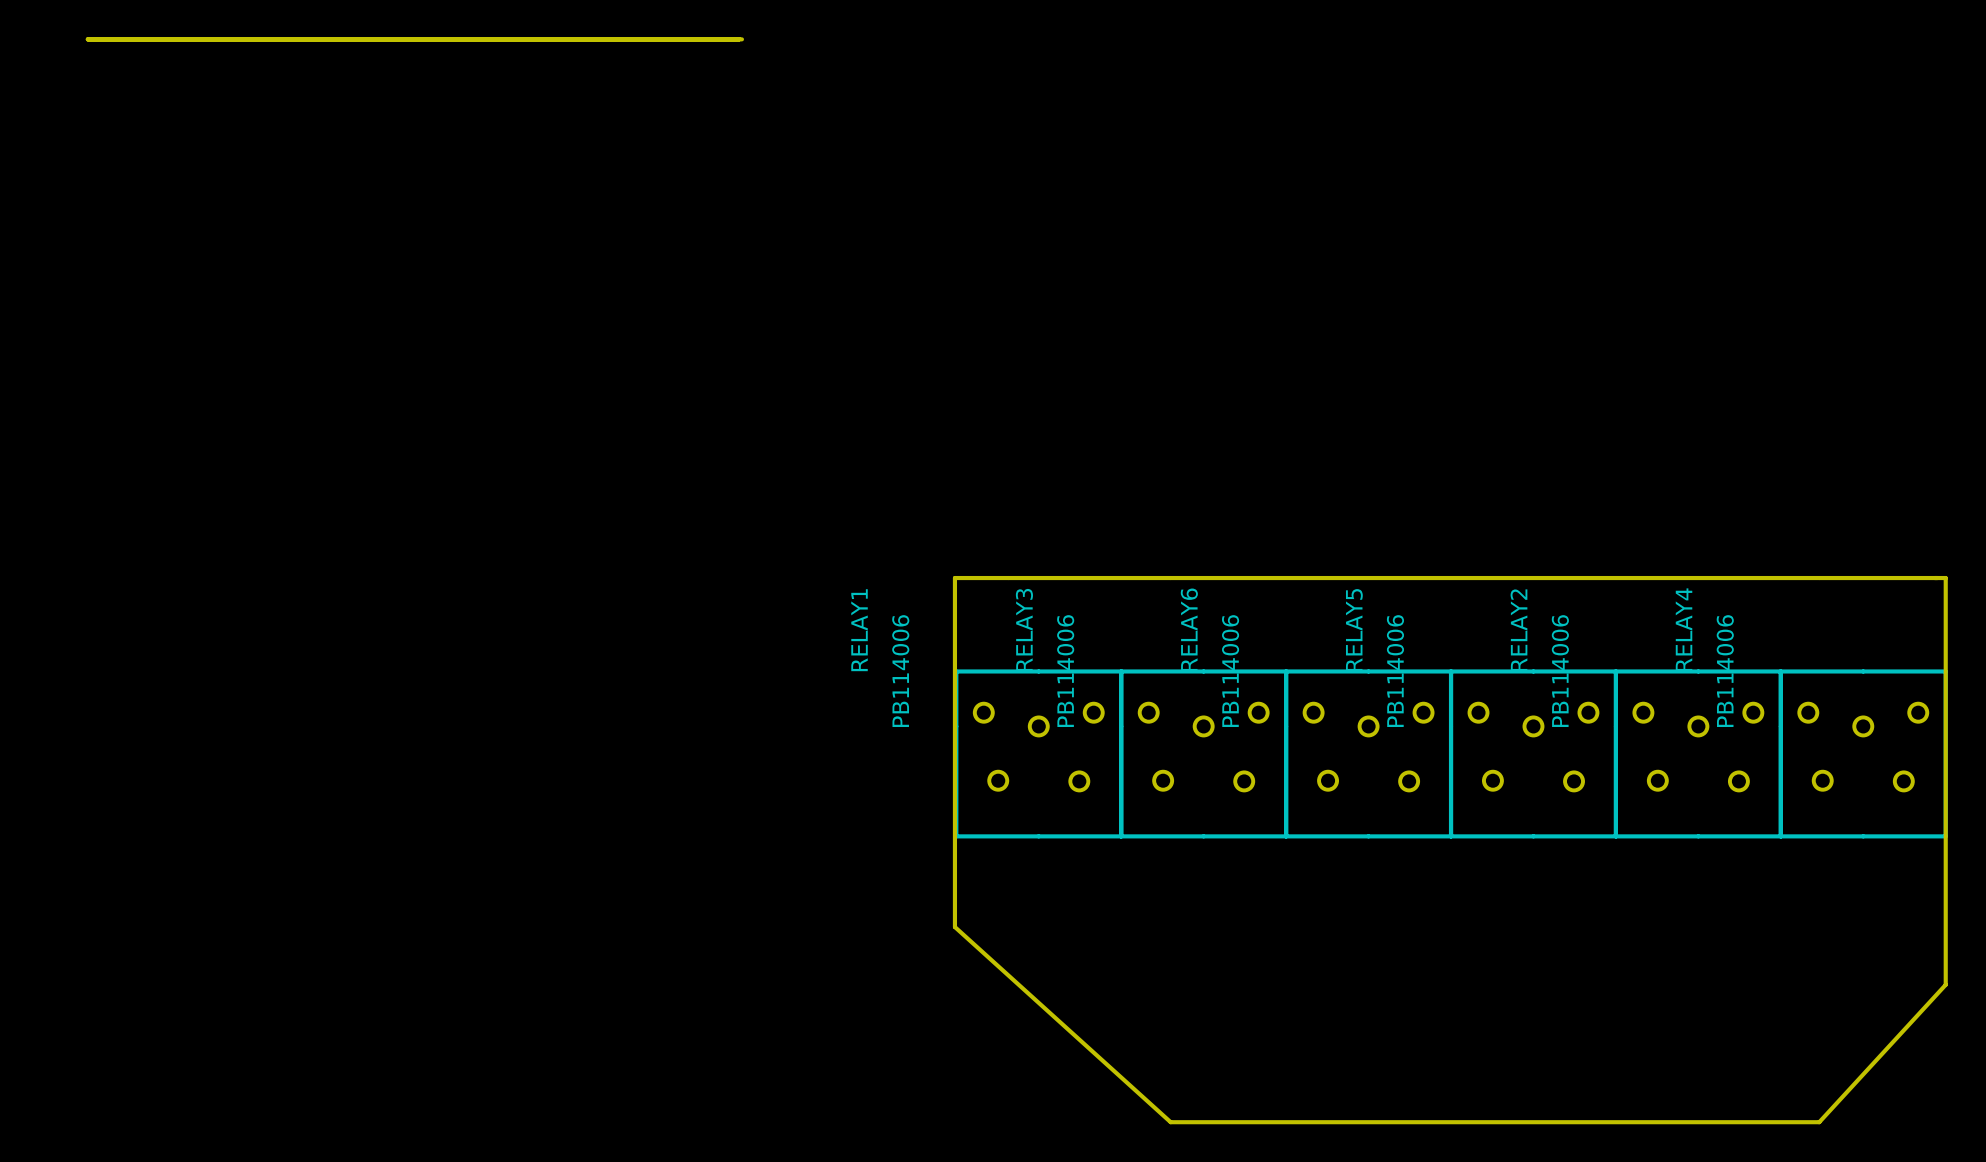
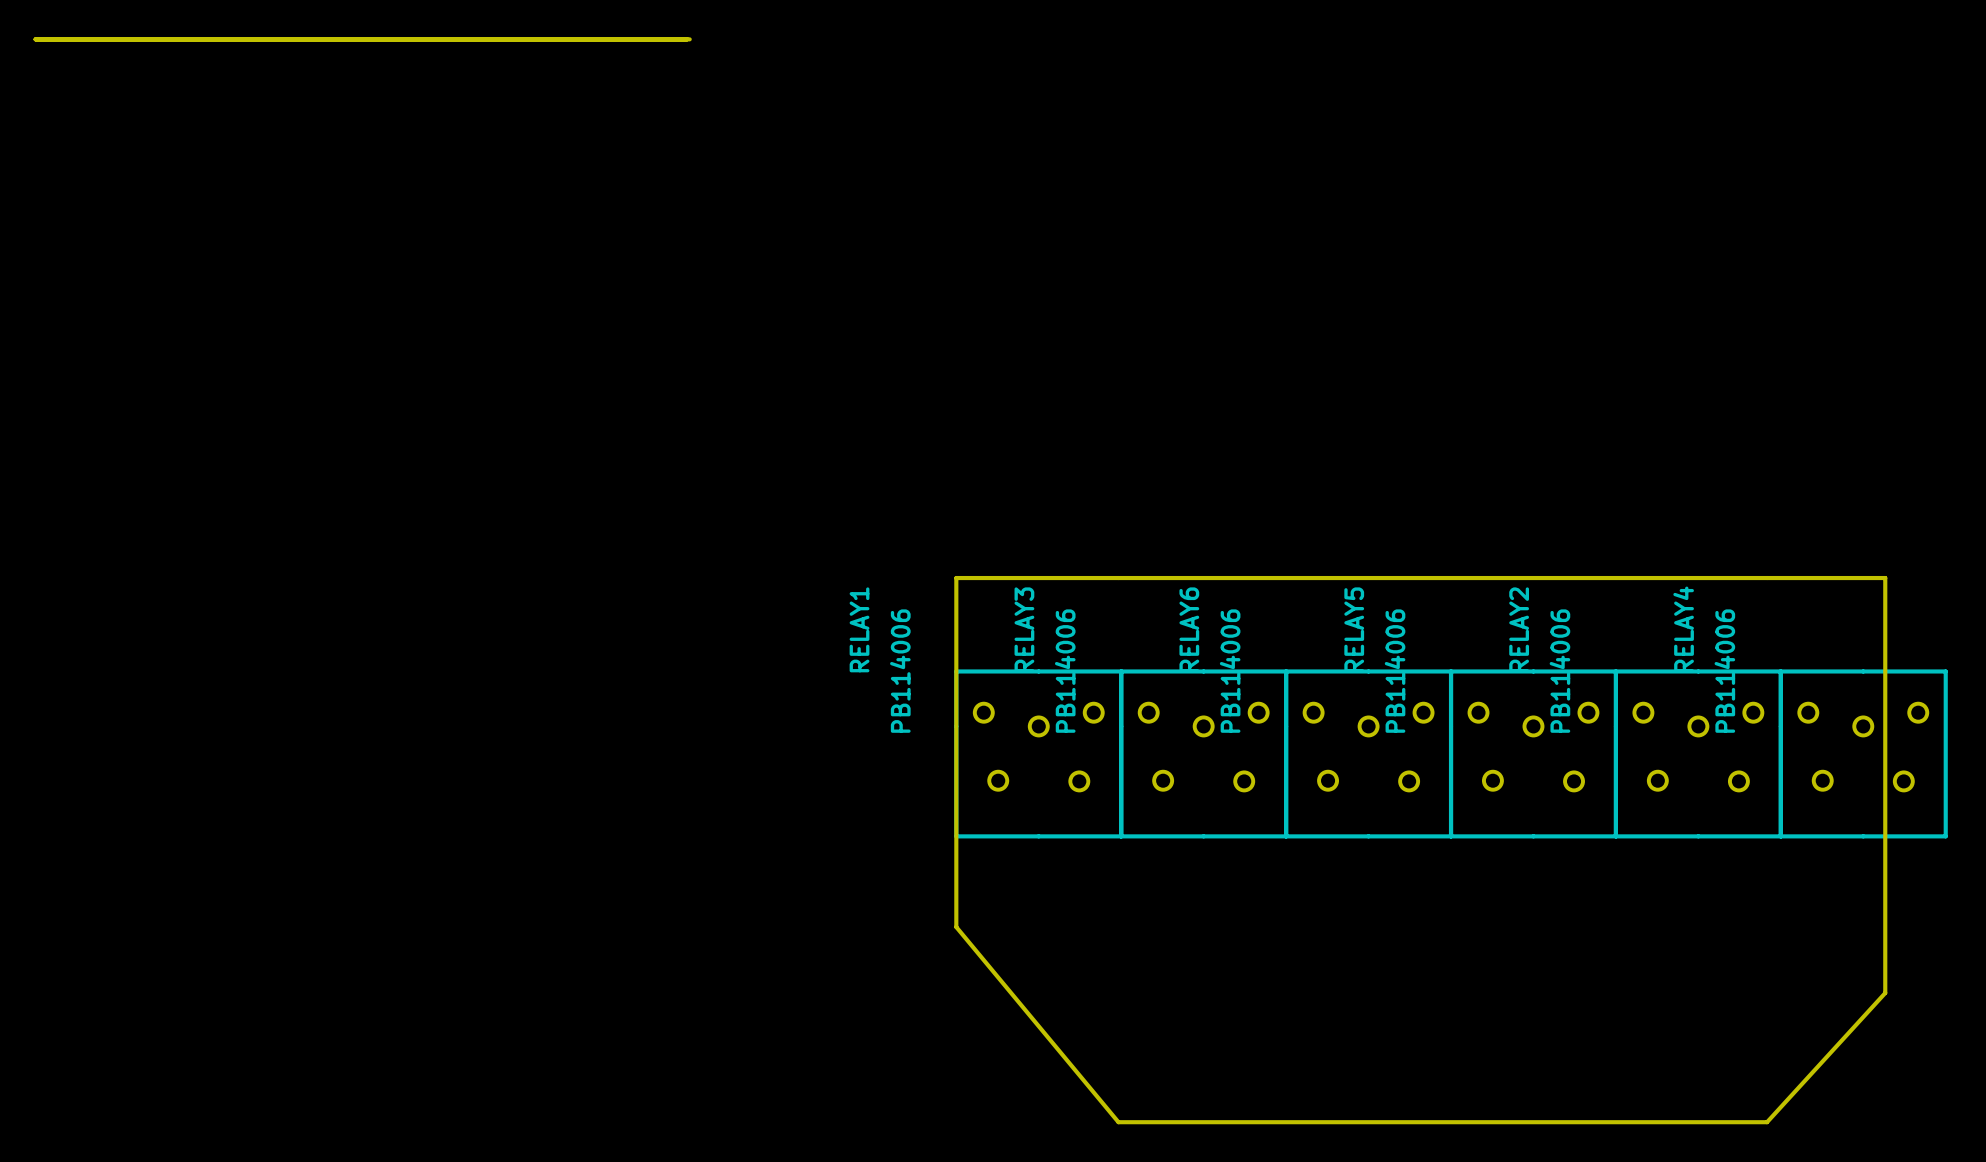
board edge: none -> (35, 39) (87, 39)
board edge: (689, 39) (741, 39) -> none
board edge: (956, 578) (954, 927) (1170, 1122) -> (956, 578) (956, 927) (1118, 1122) (1170, 1122)
board edge: (1885, 578) (1945, 578) (1945, 984) (1819, 1122) (1767, 1122) -> (1885, 578) (1885, 993) (1767, 1122)

